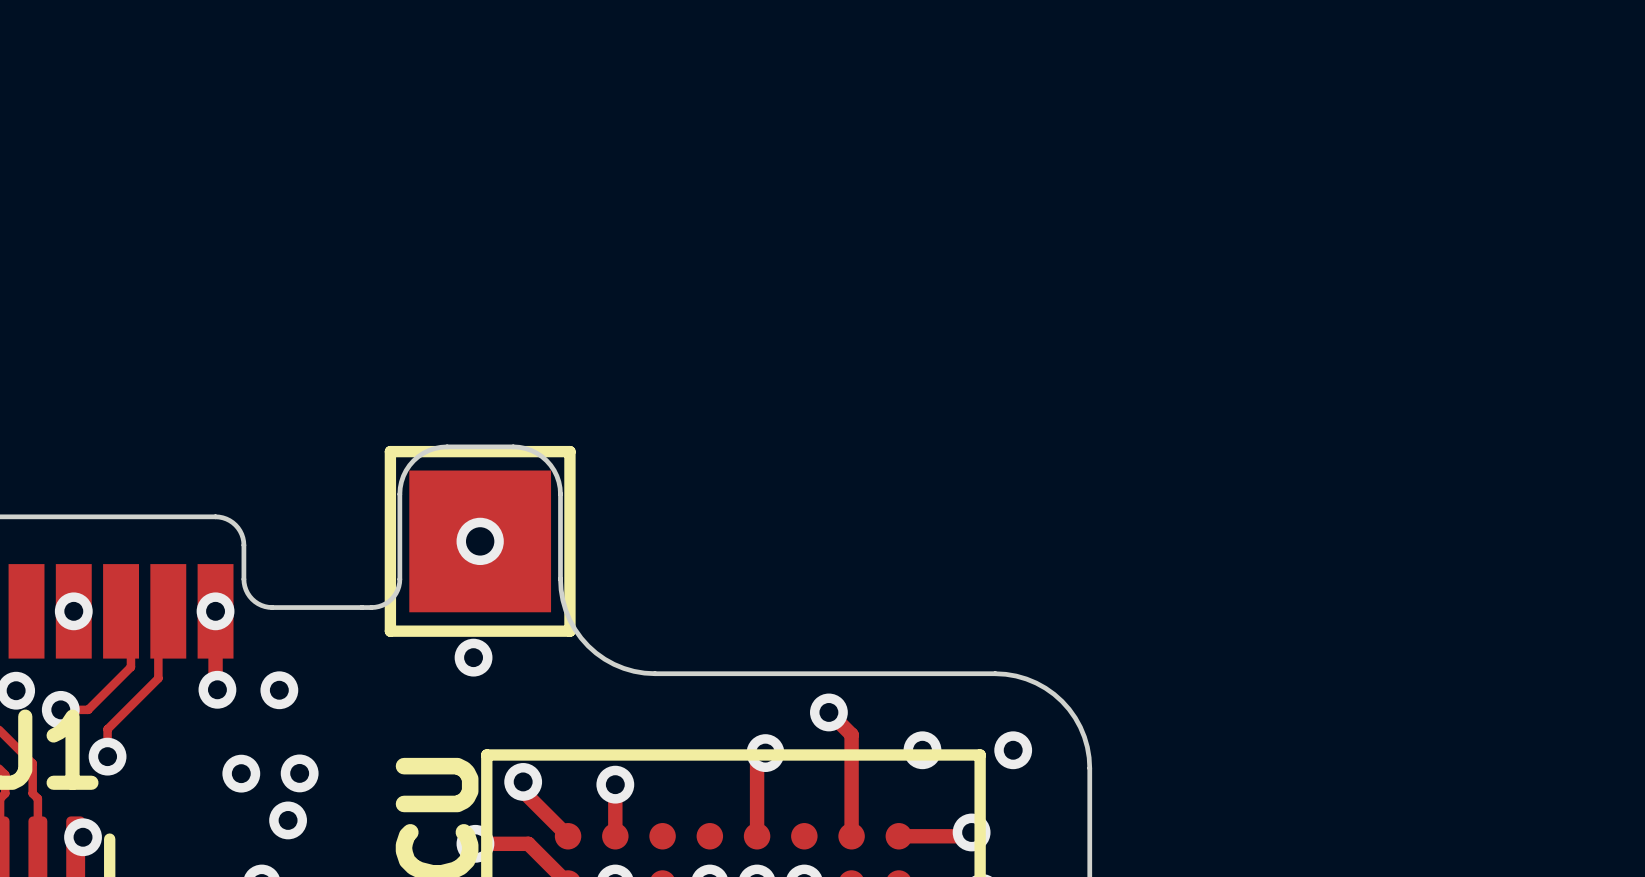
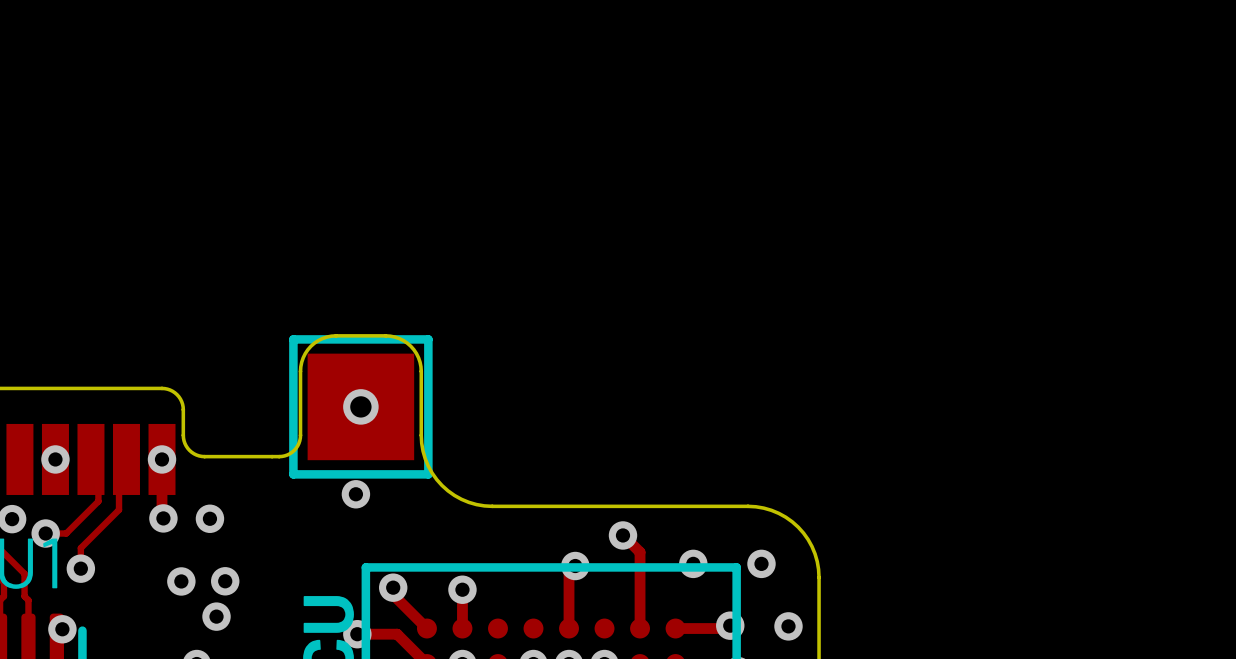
via: none -> (788, 626)

